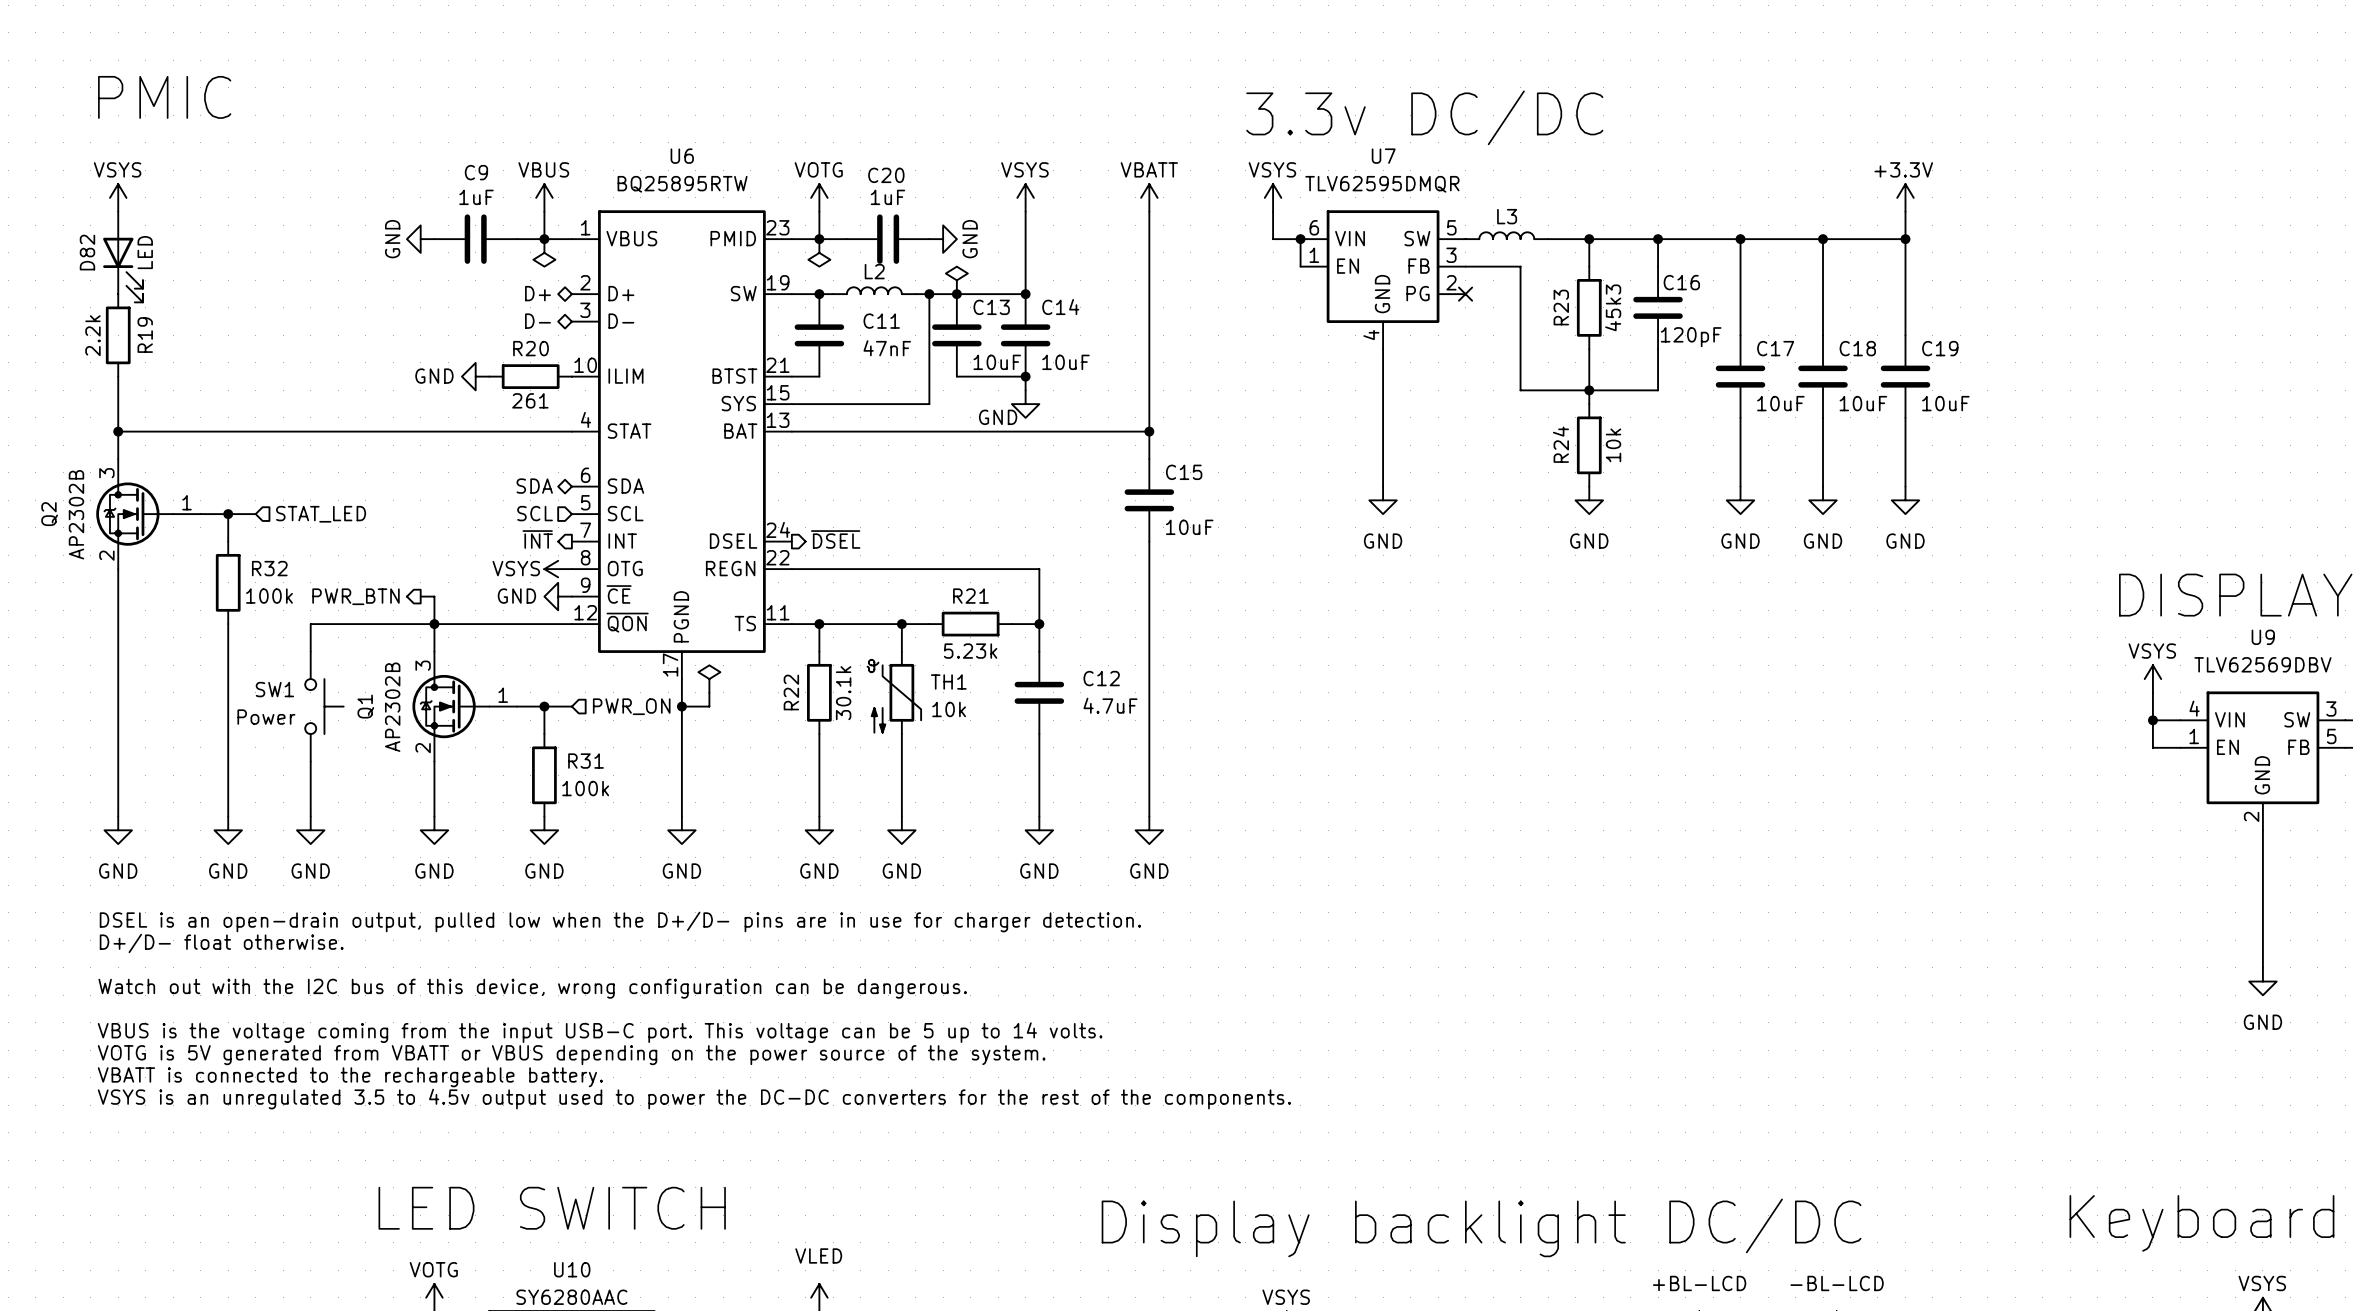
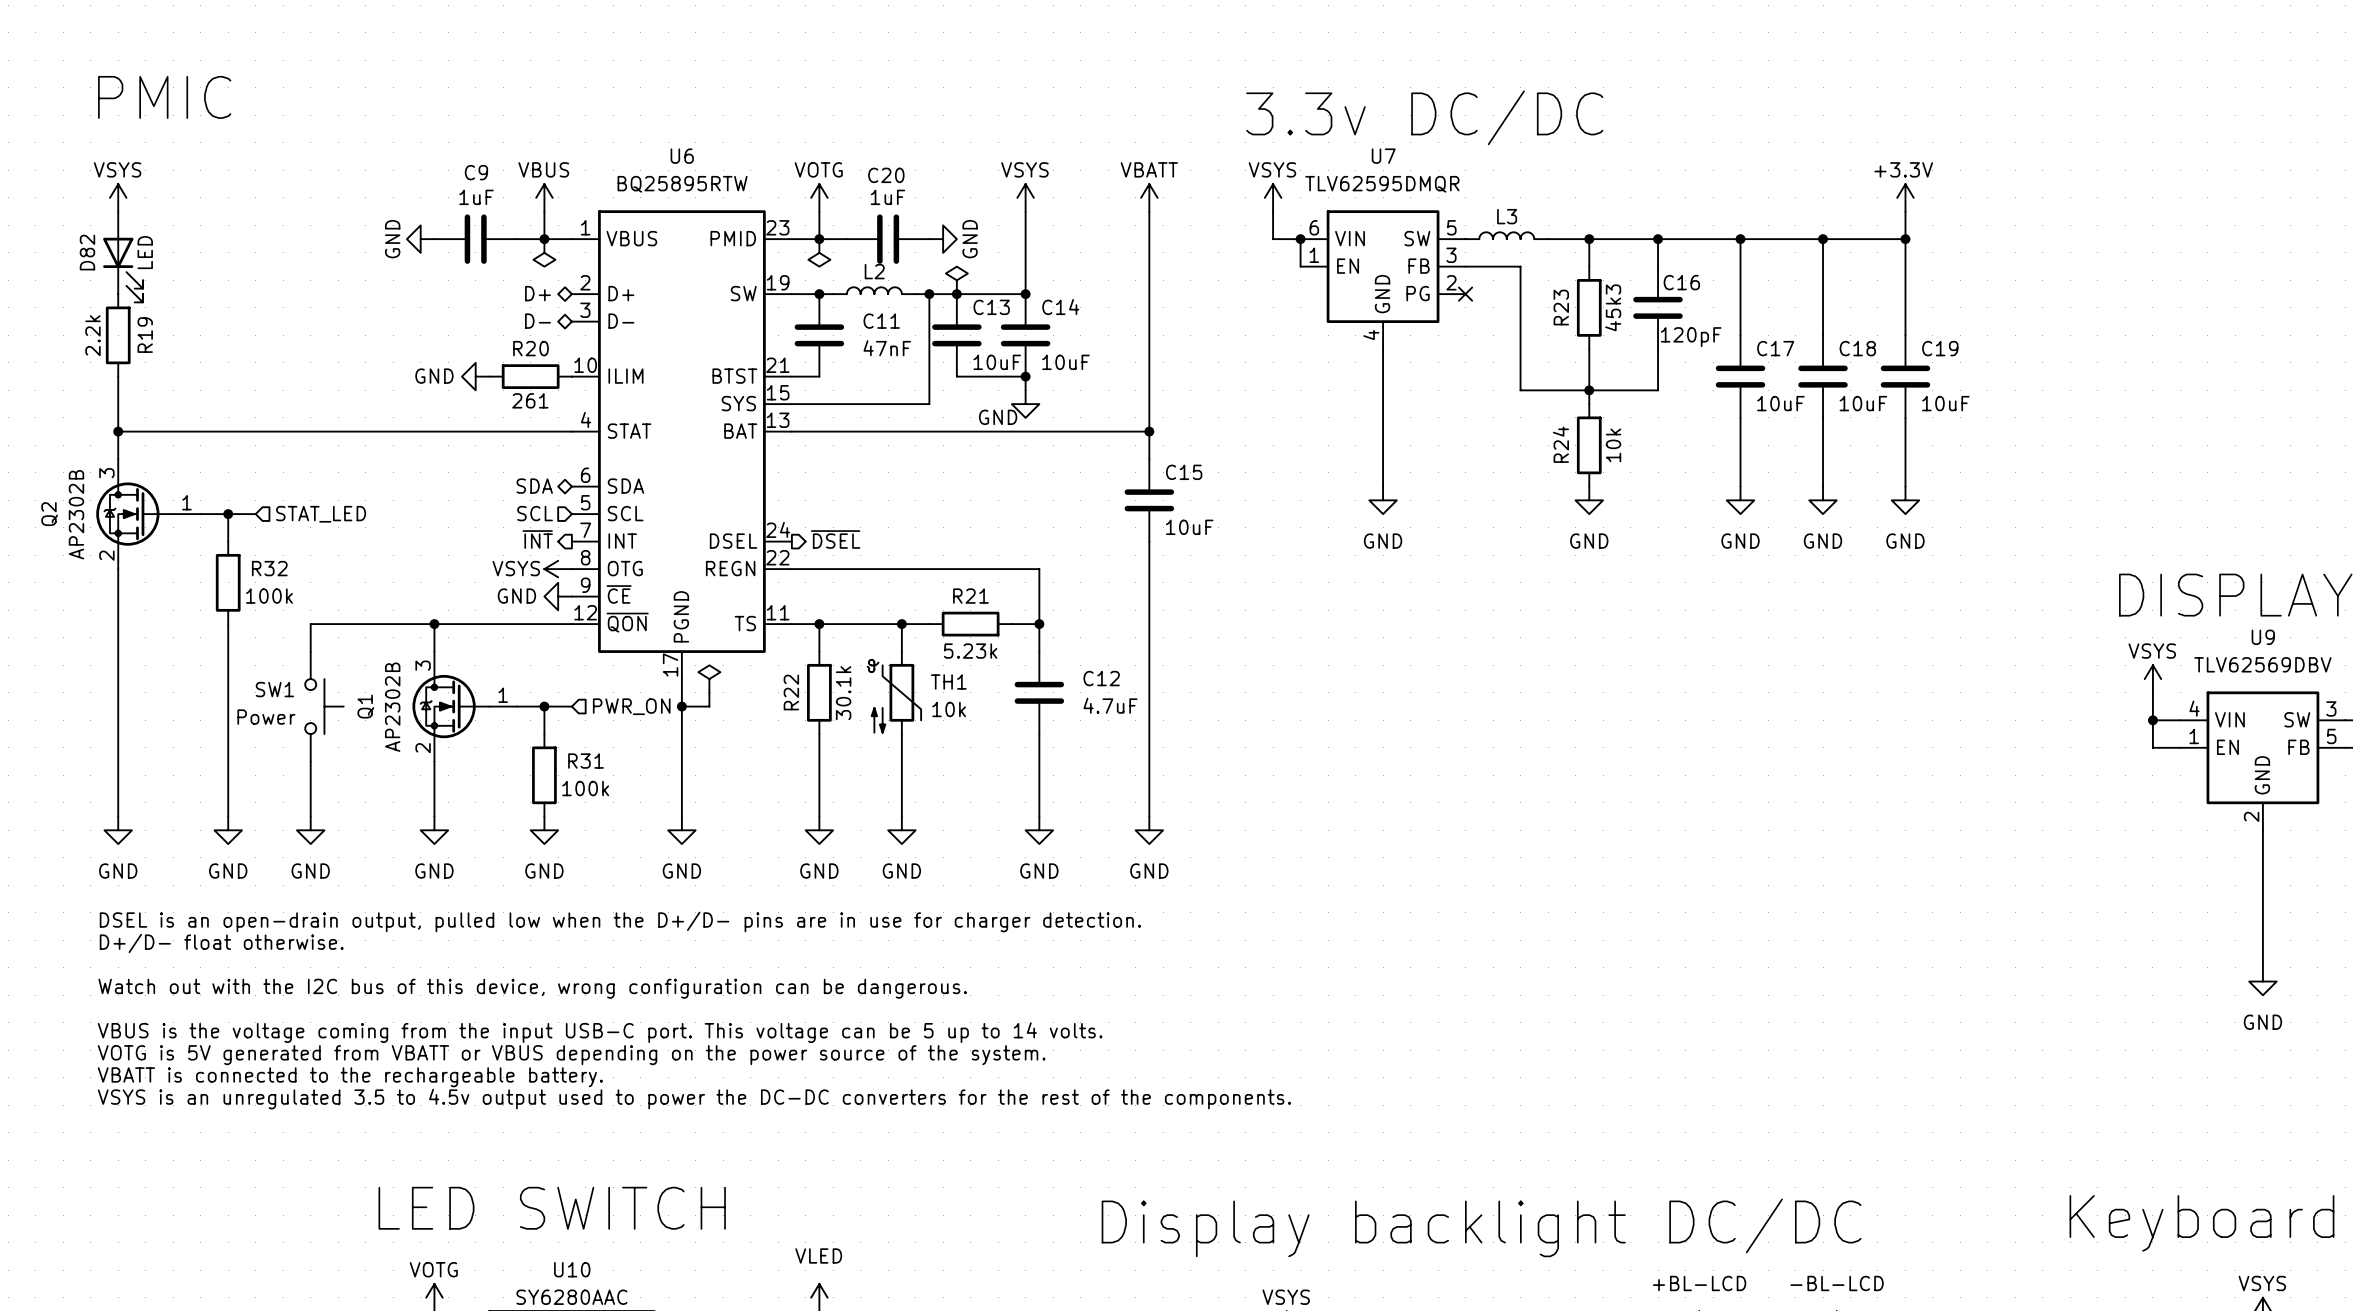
hierarchical label: PWR_BTN (355, 596) -> none
wire: (420, 596) (434, 596) (434, 624) -> none

